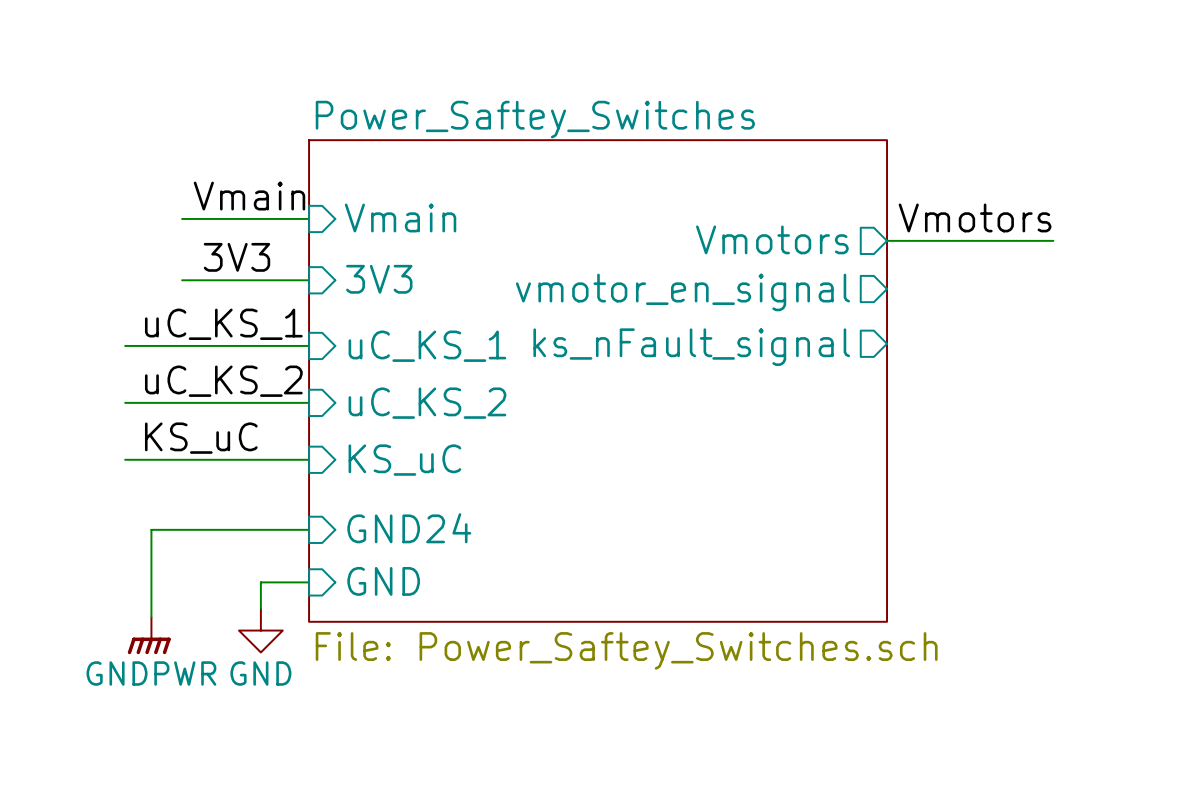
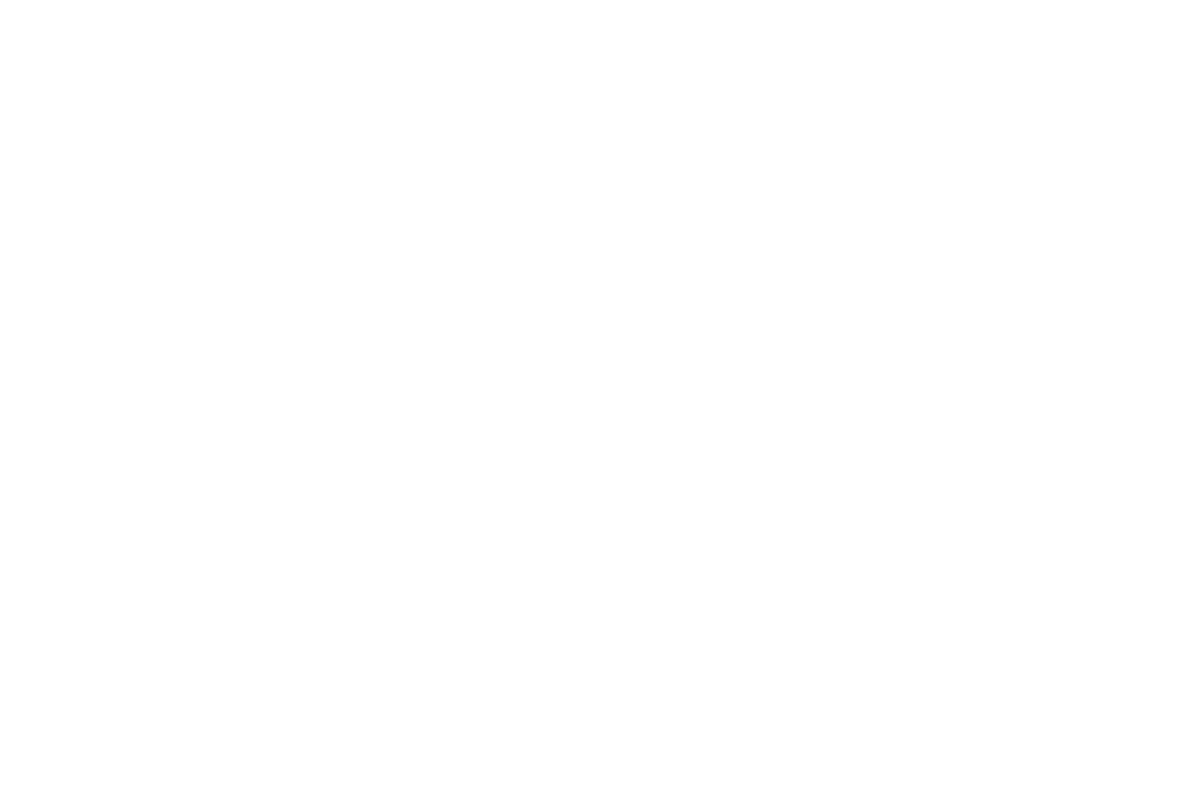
label: Vmain (249, 196) -> none
label: Vmotors (975, 217) -> none
wire: (182, 218) (309, 218) -> none
sheet pin: Vmain (400, 218) -> none
sheet pin: Vmotors (772, 239) -> none
wire: (887, 240) (1053, 240) -> none
label: 3V3 (236, 257) -> none
sheet pin: 3V3 (379, 279) -> none
wire: (182, 280) (309, 280) -> none
sheet pin: vmotor_en_signal (682, 292) -> none
label: uC_KS_1 (223, 324) -> none
wire: (125, 345) (309, 345) -> none
sheet pin: uC_KS_1 (427, 346) -> none
sheet pin: ks_nFault_signal (691, 347) -> none
sheet Power_Saftey_Switches: File: Power_Saftey_Switches.sch (598, 380) -> none
label: uC_KS_2 (223, 381) -> none
wire: (125, 402) (309, 402) -> none
sheet pin: uC_KS_2 (427, 403) -> none
label: KS_uC (201, 438) -> none
wire: (125, 459) (309, 459) -> none
sheet pin: KS_uC (404, 460) -> none
sheet pin: GND24 (409, 528) -> none
wire: (309, 529) (151, 529) (151, 617) -> none
sheet pin: GND (383, 581) -> none
wire: (309, 582) (260, 582) (260, 608) -> none
power symbol: GND (260, 630) -> none
power symbol: GNDPWR (149, 635) -> none

